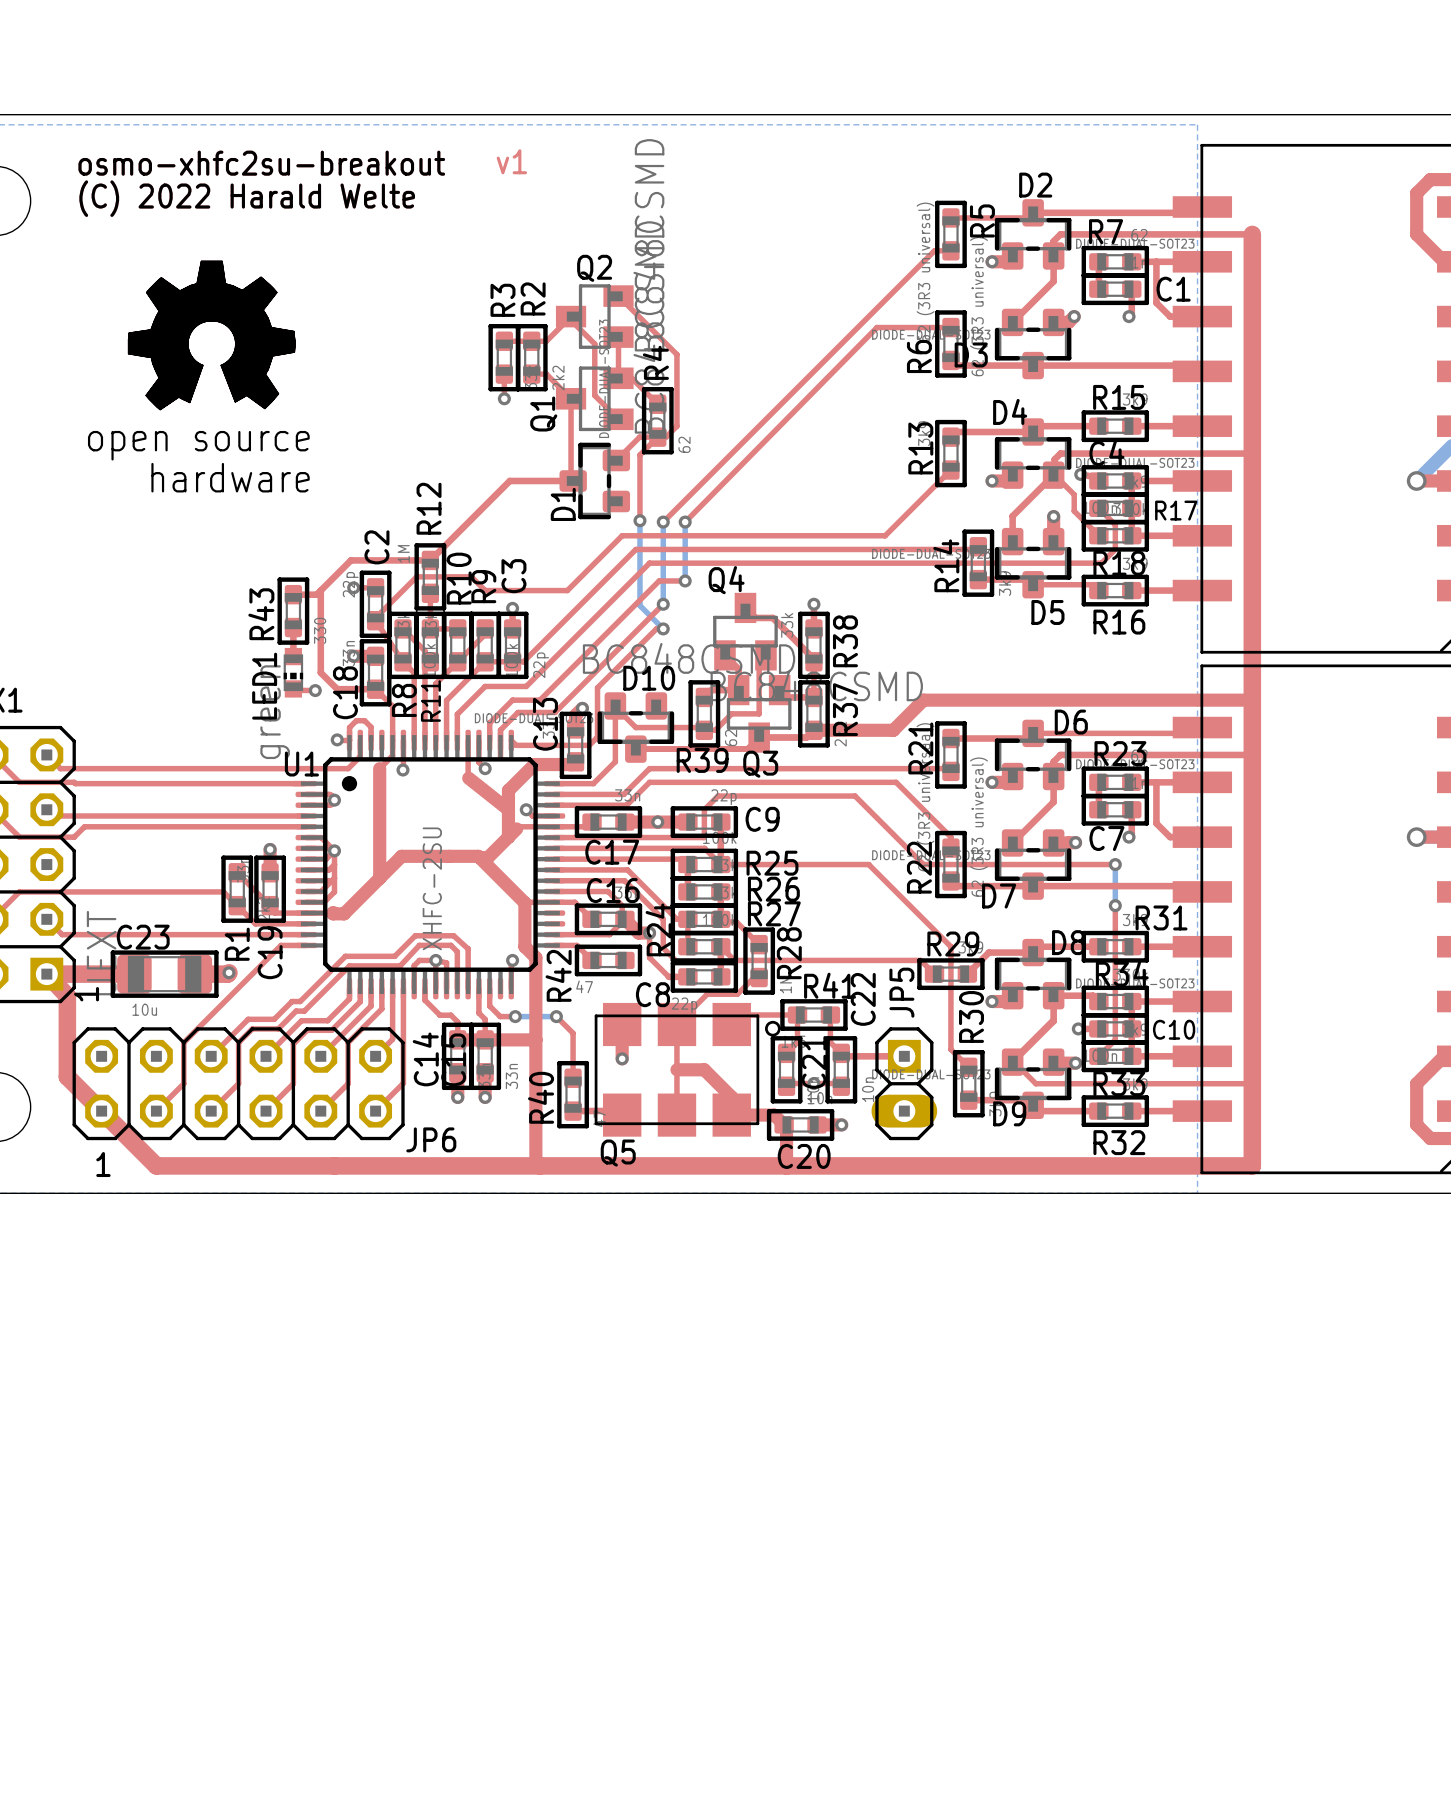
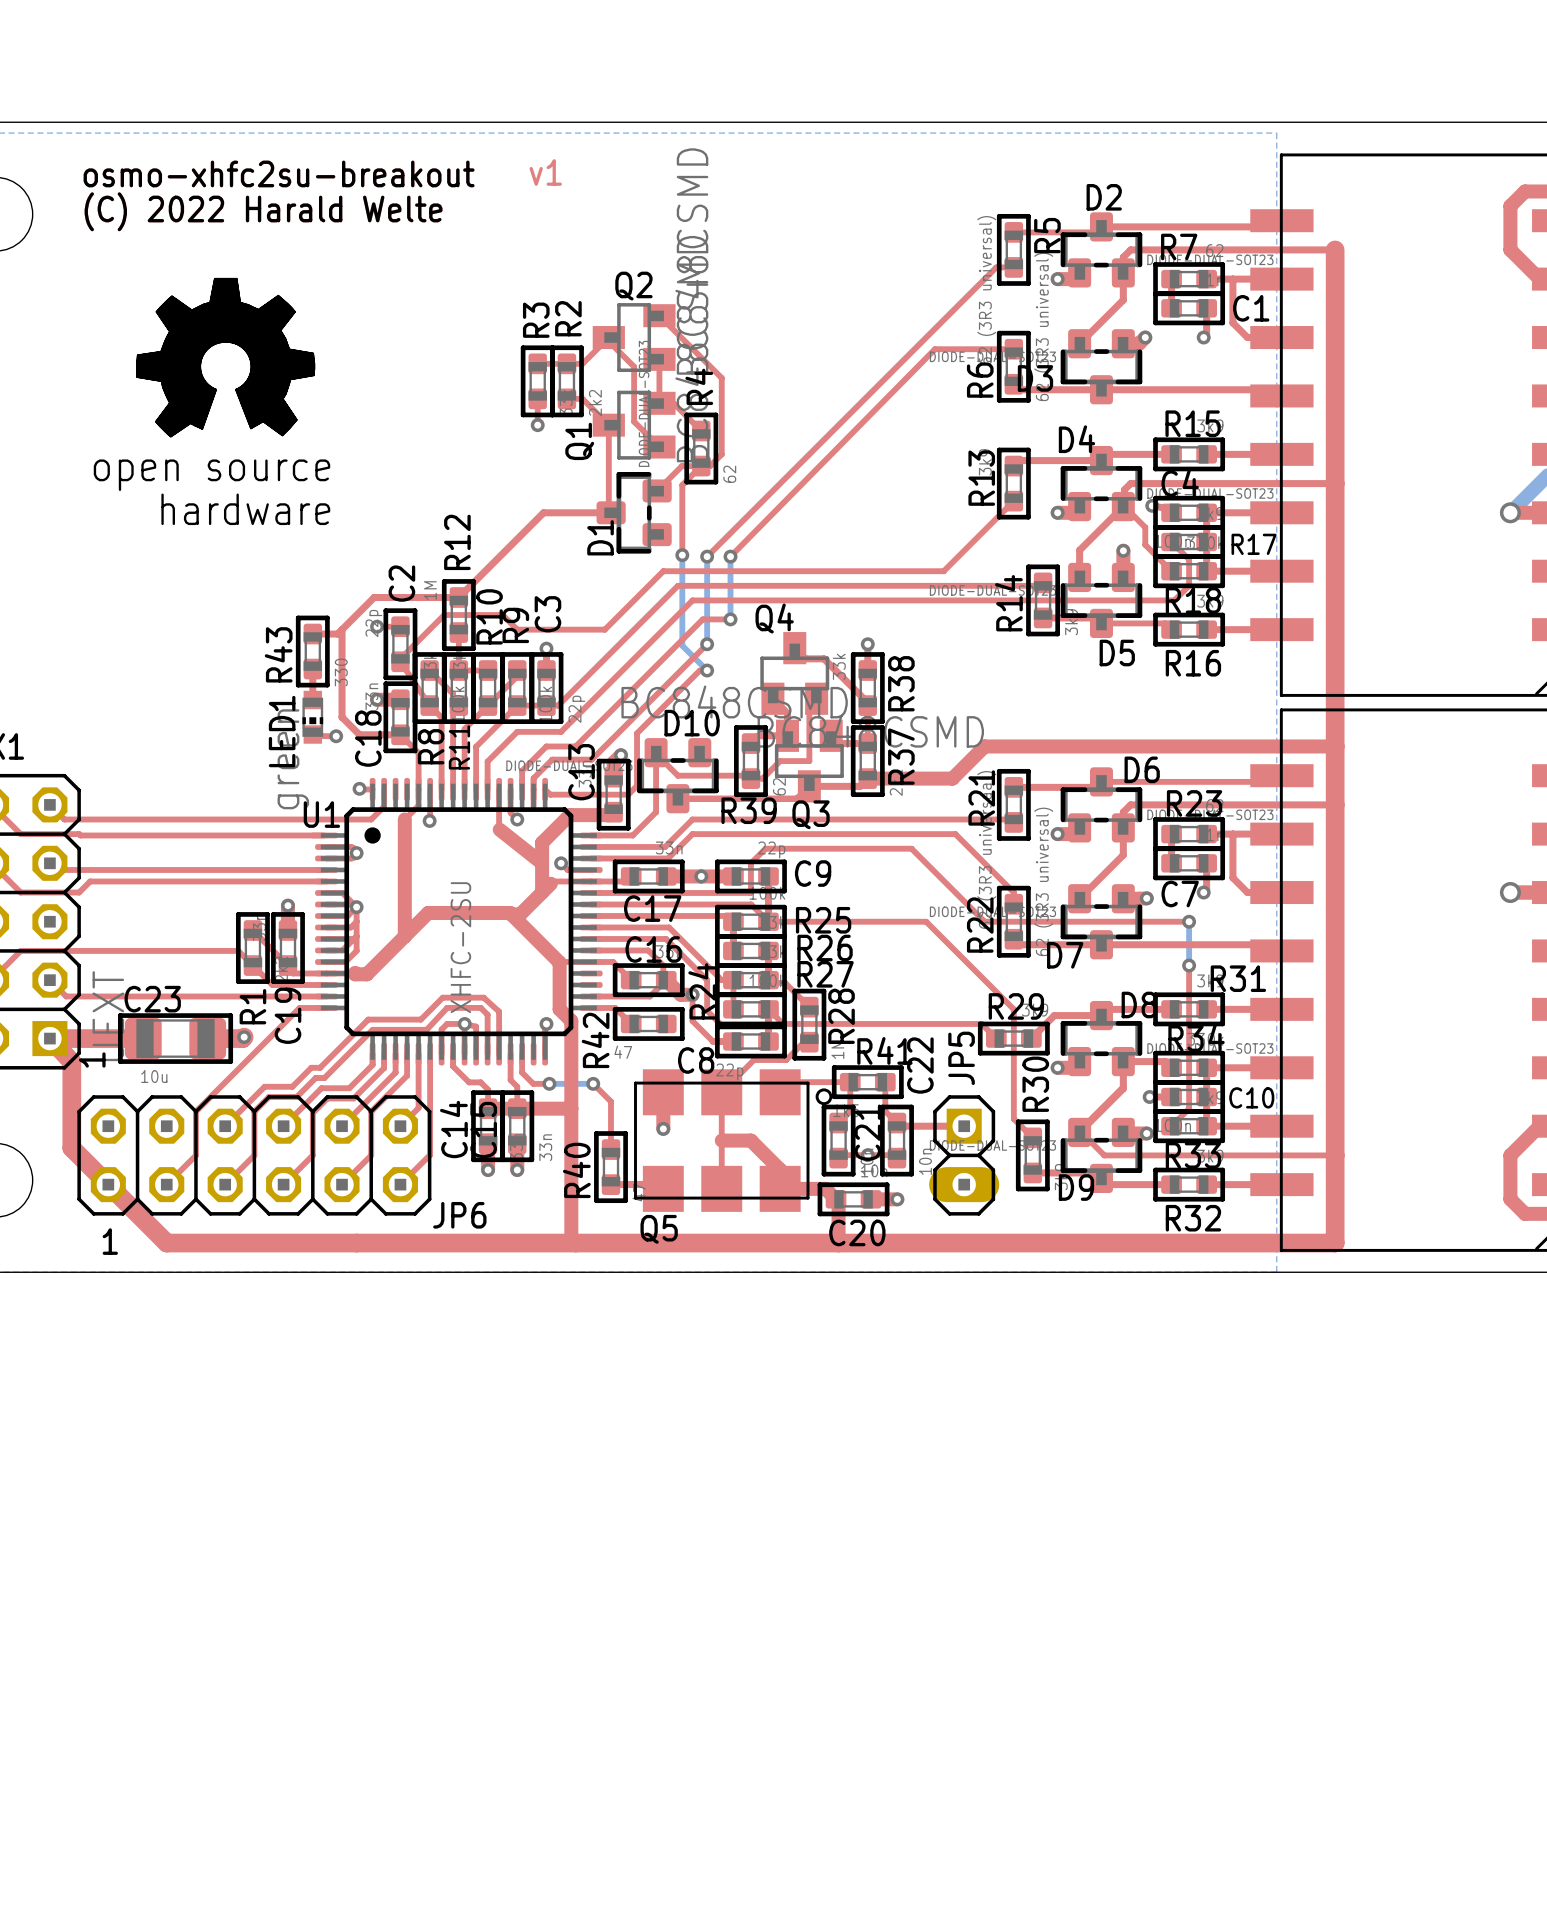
top track: (349, 740) (349, 727) (356, 720) (364, 720) (371, 727) (371, 740) -> none

